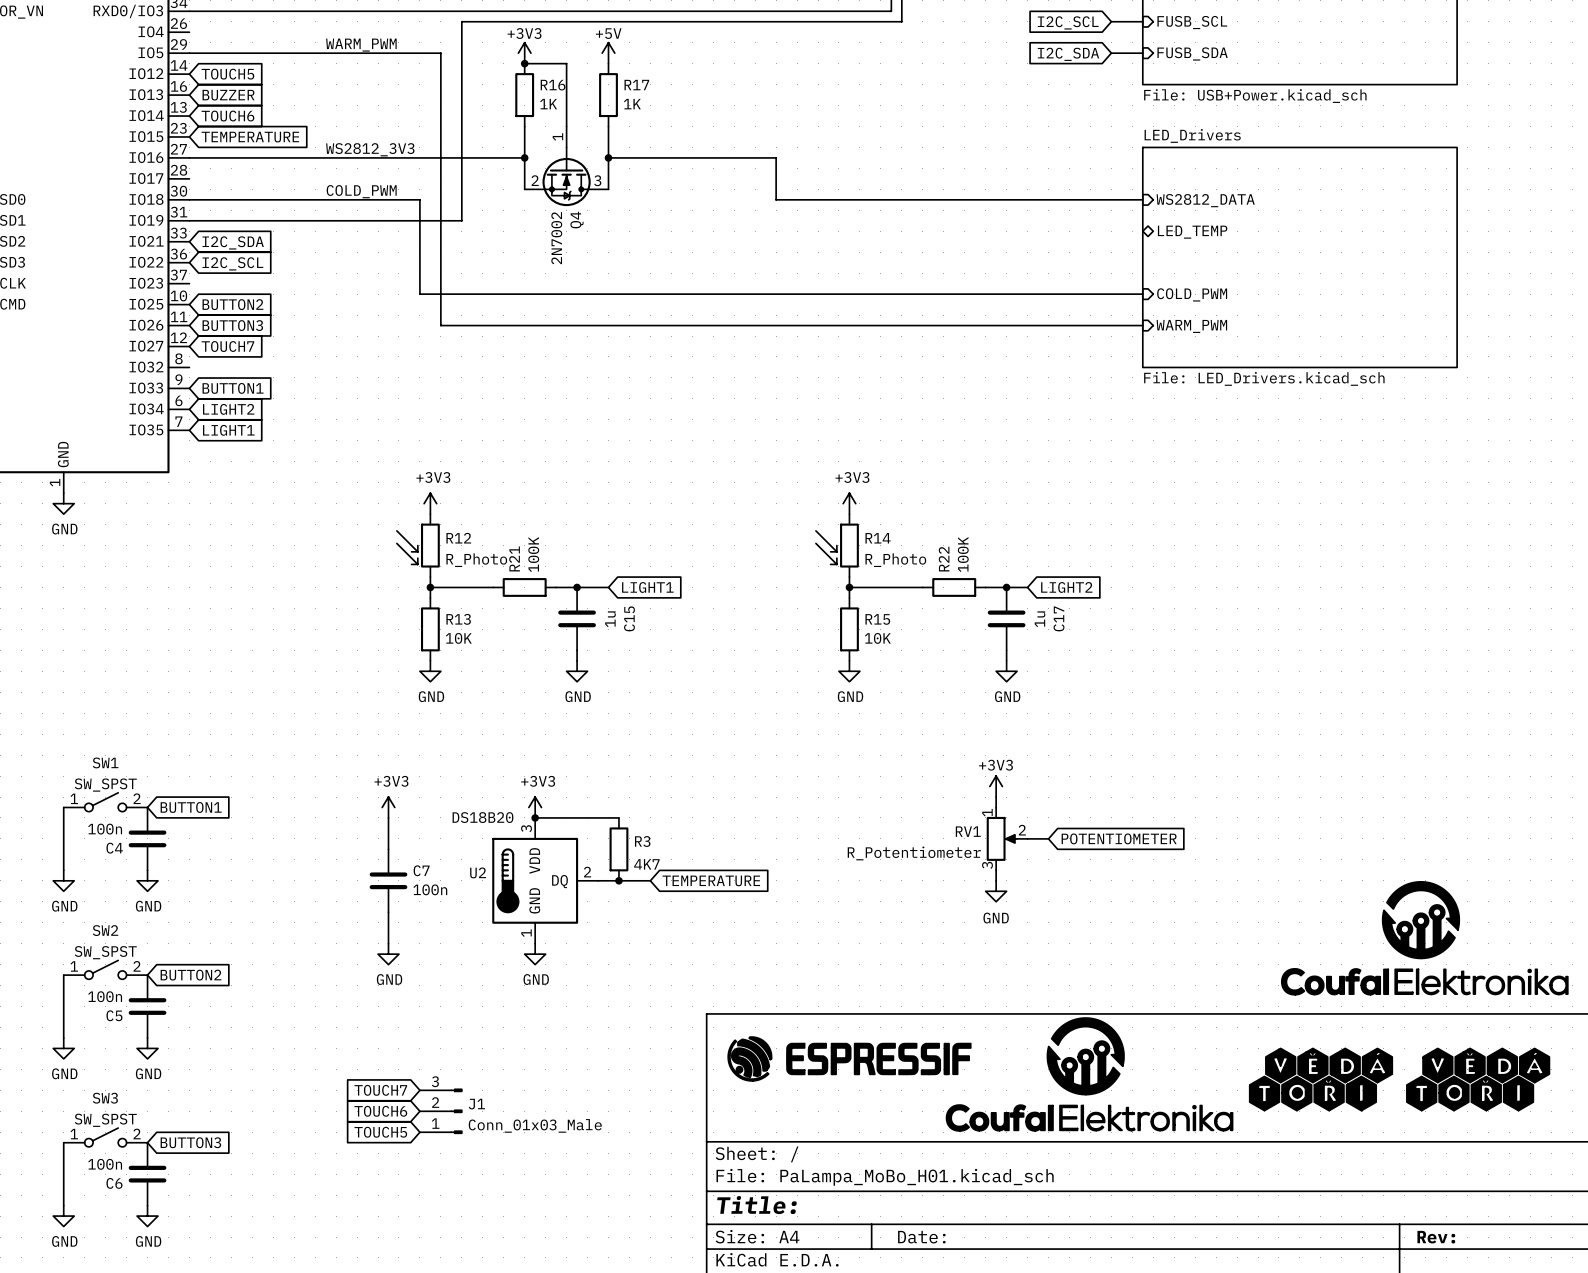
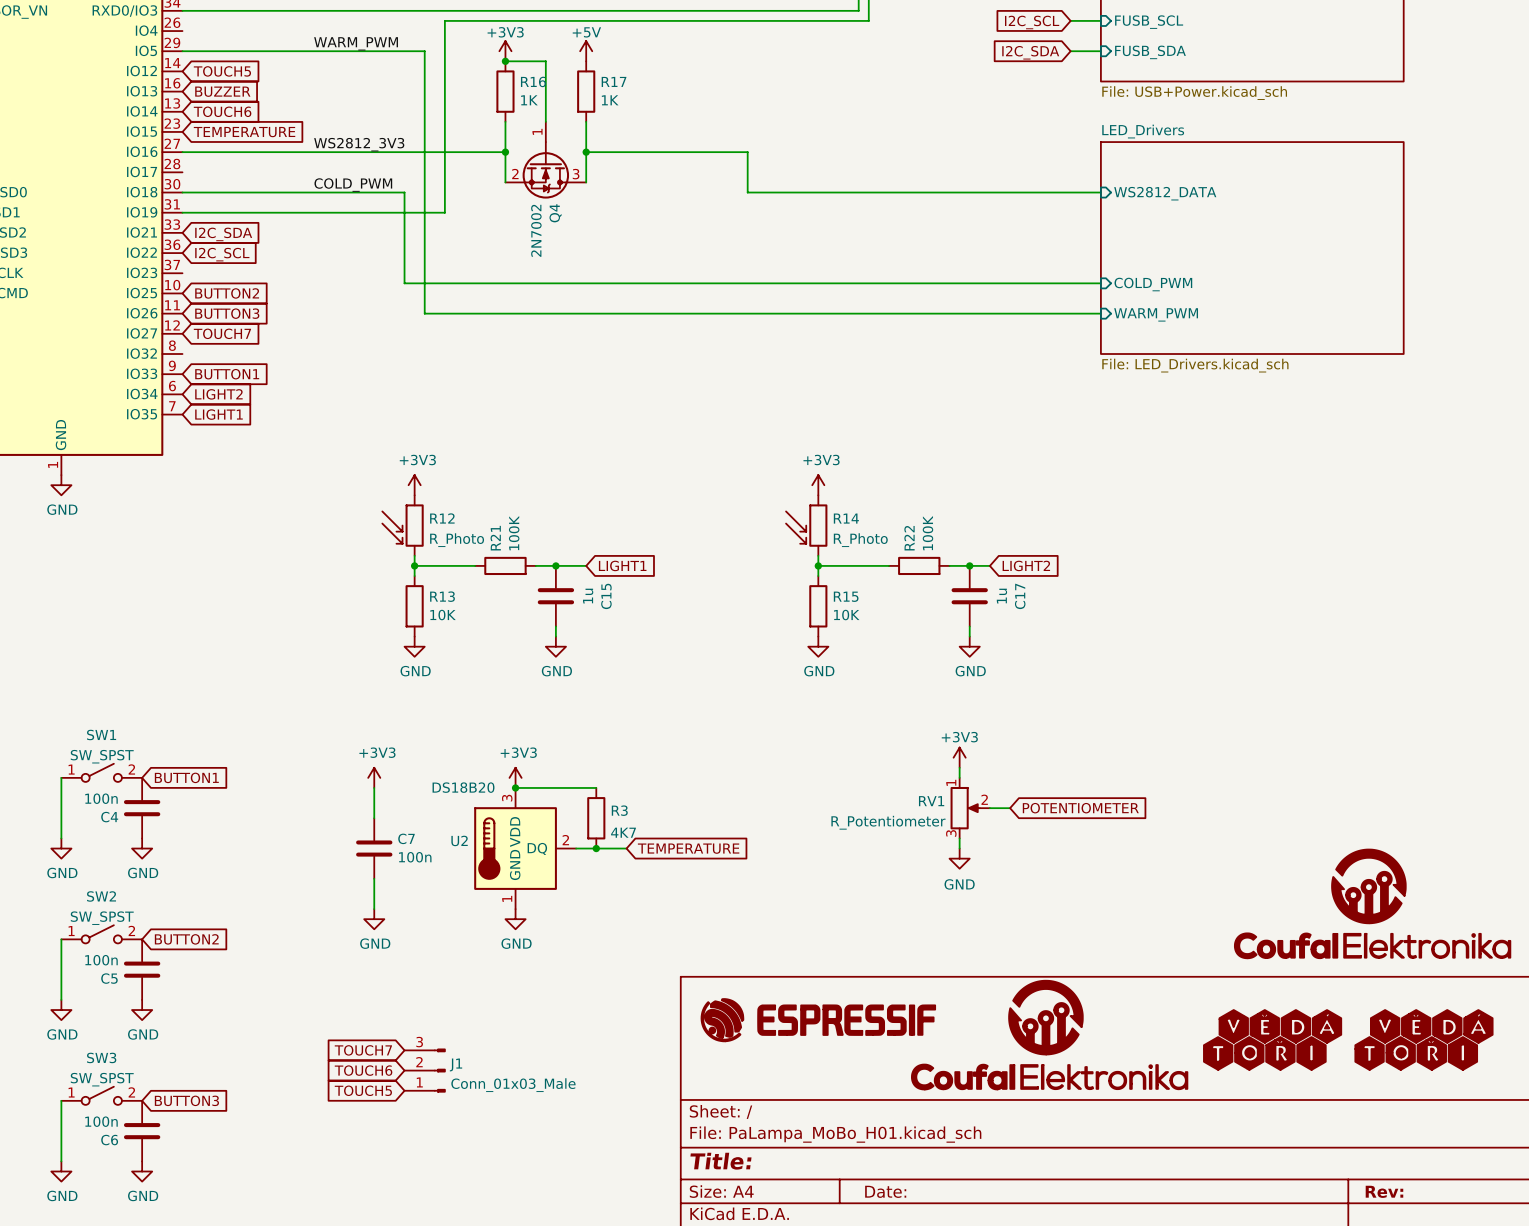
sheet pin: LED_TEMP (1192, 232) -> none

